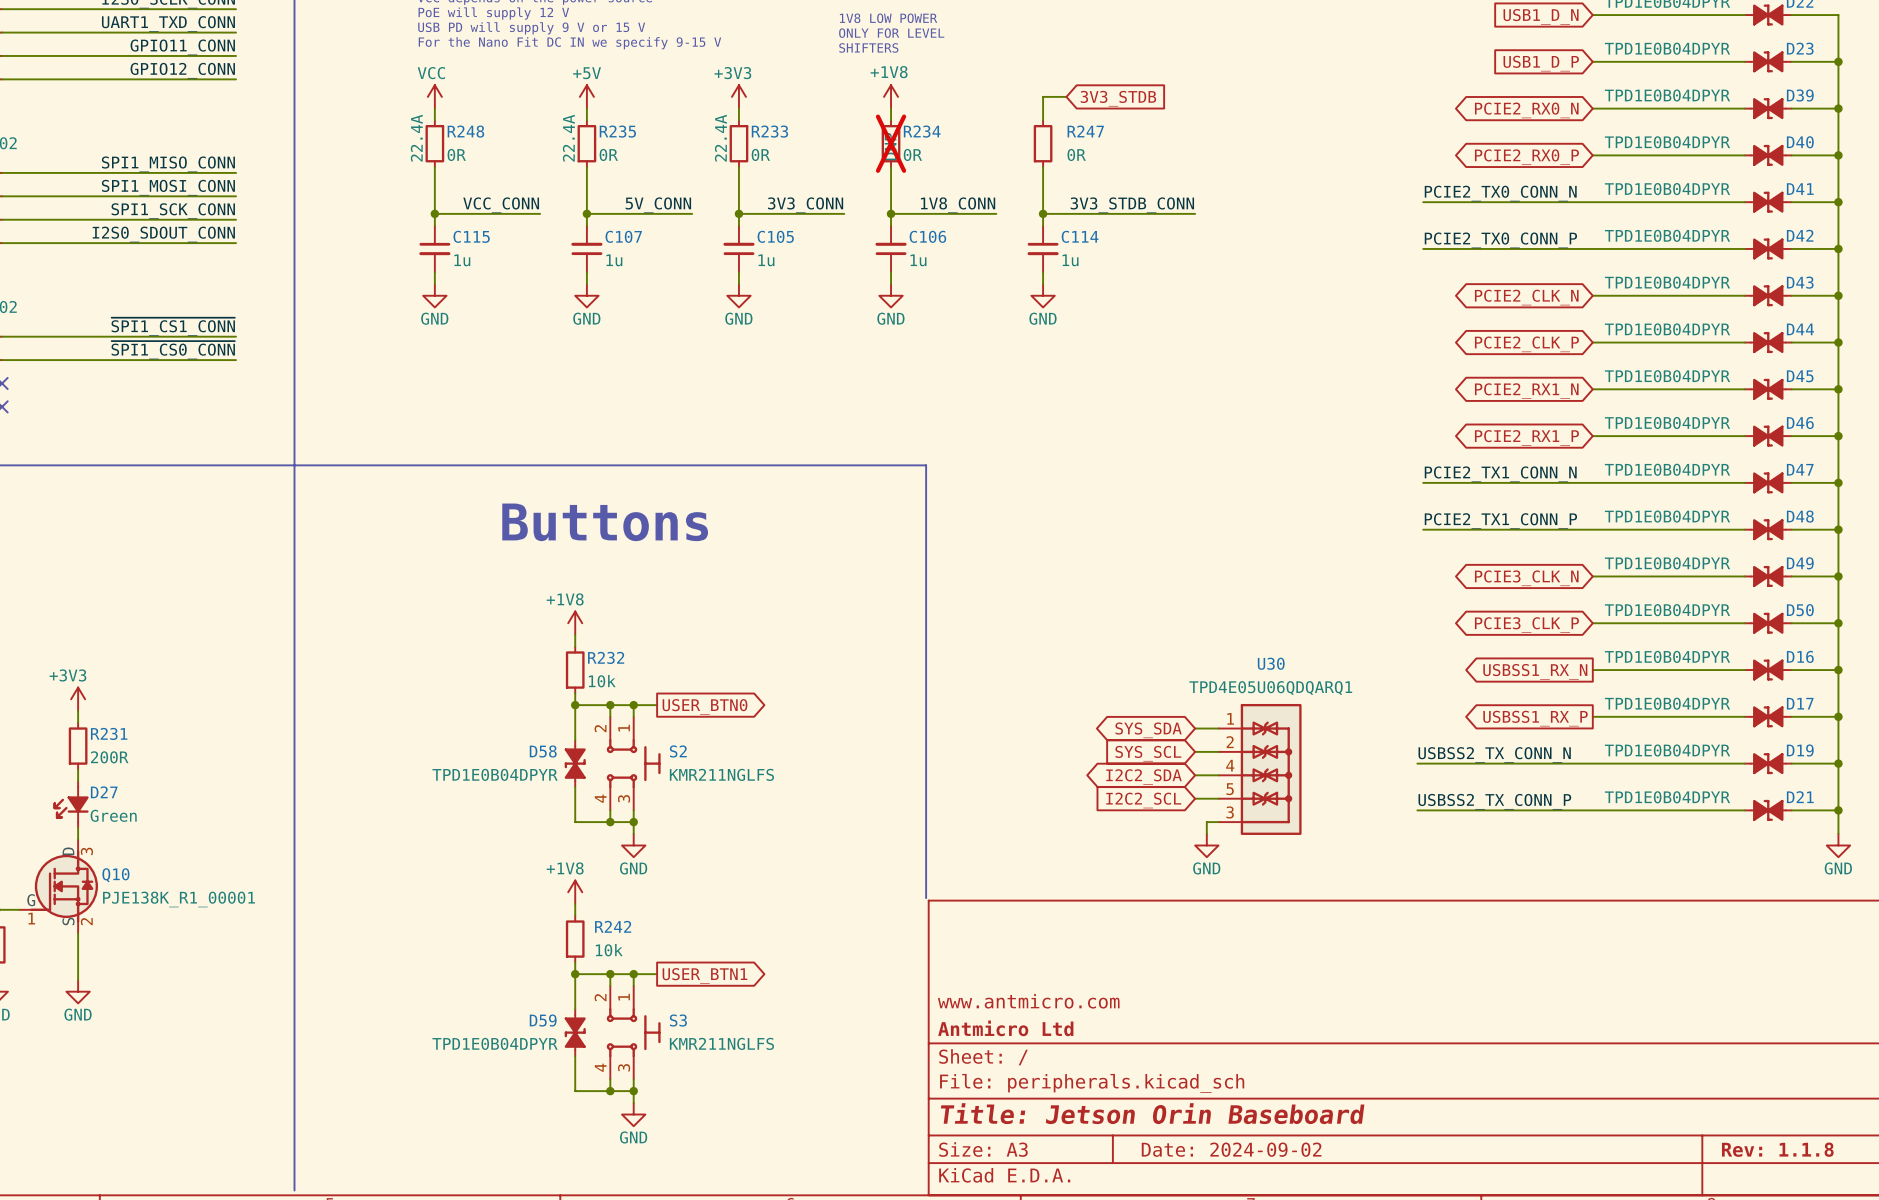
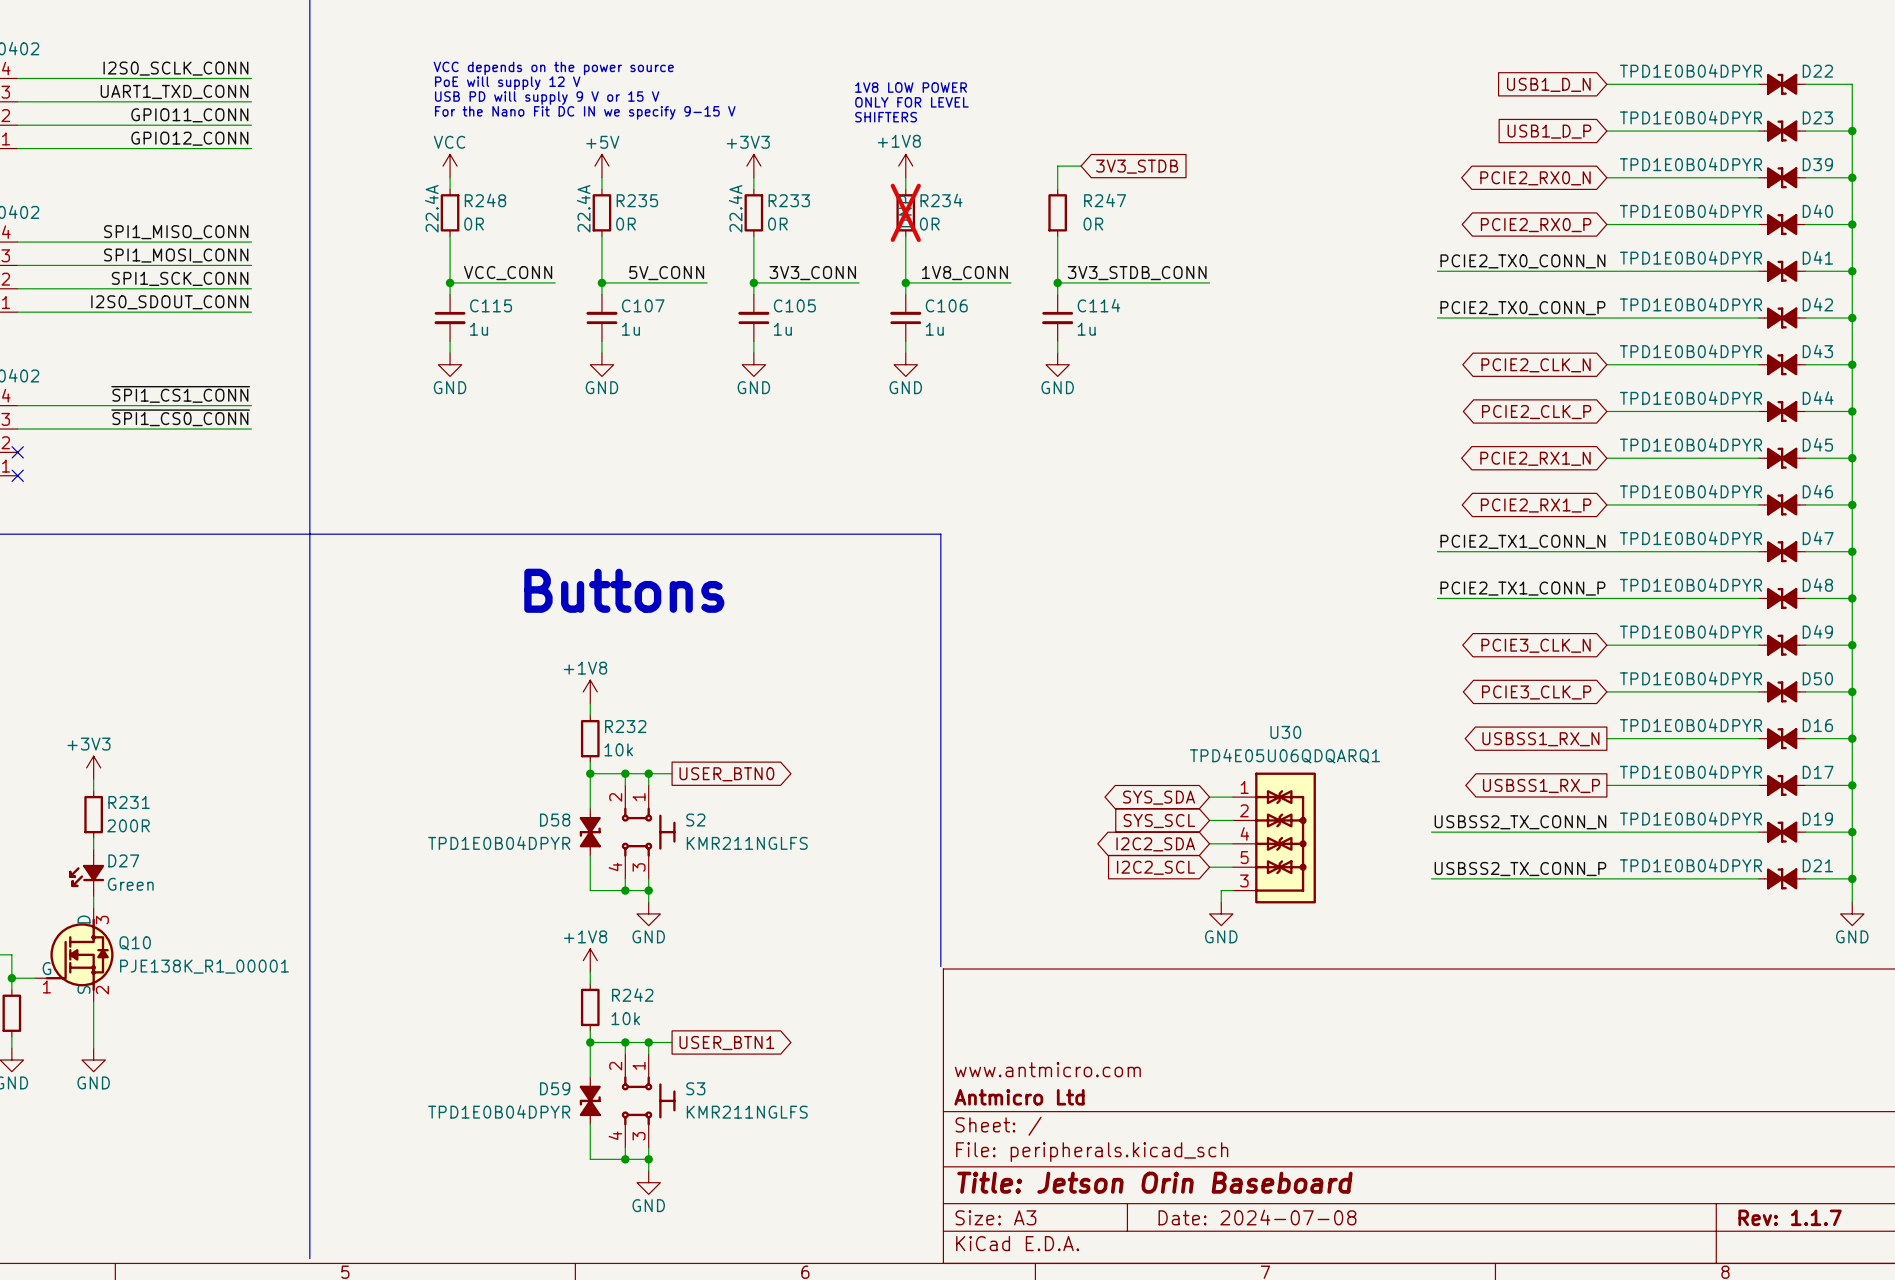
title block: Date: 2024-09-02 (1231, 1149) -> Date: 2024-07-08 (1257, 1217)
title block: Rev: 1.1.8 (1777, 1149) -> Rev: 1.1.7 (1790, 1217)

